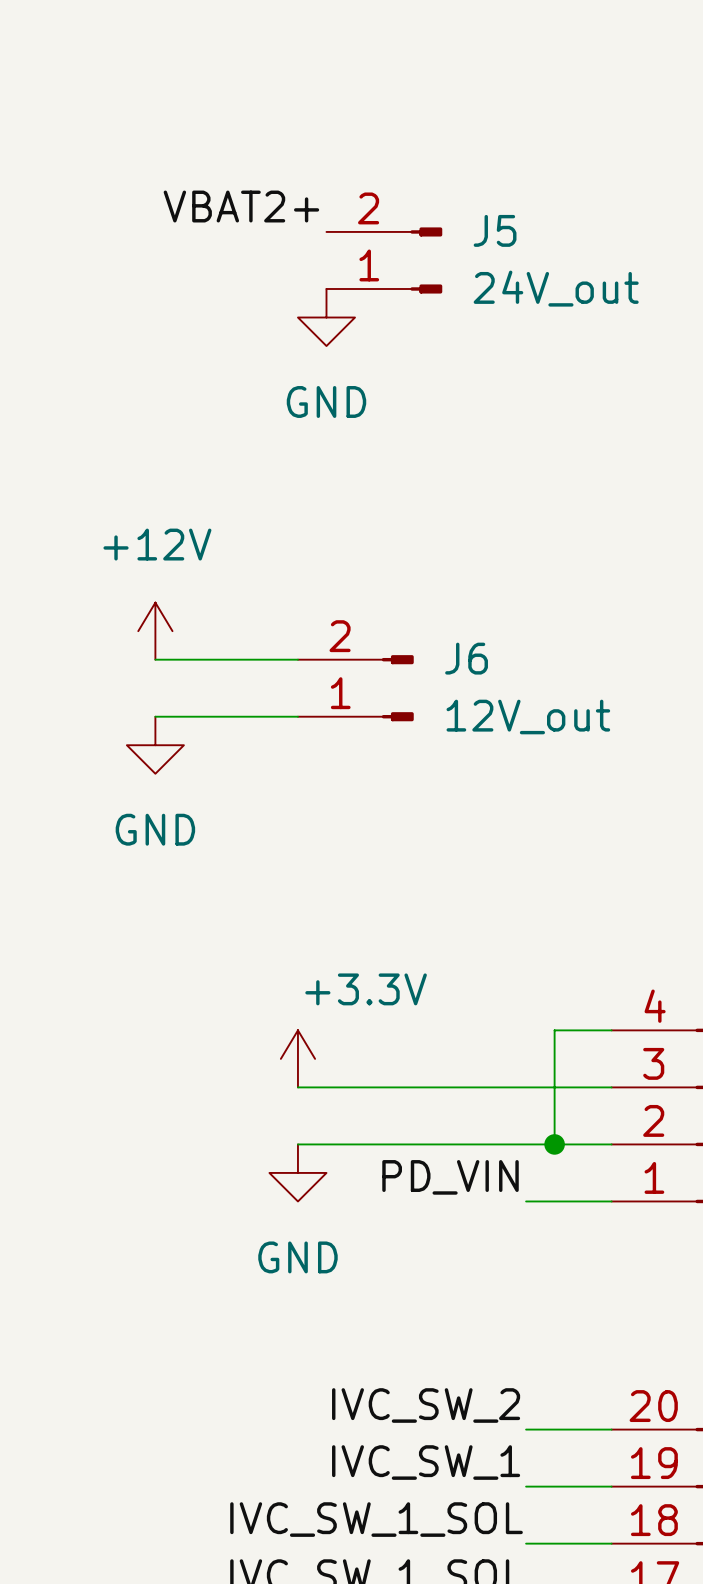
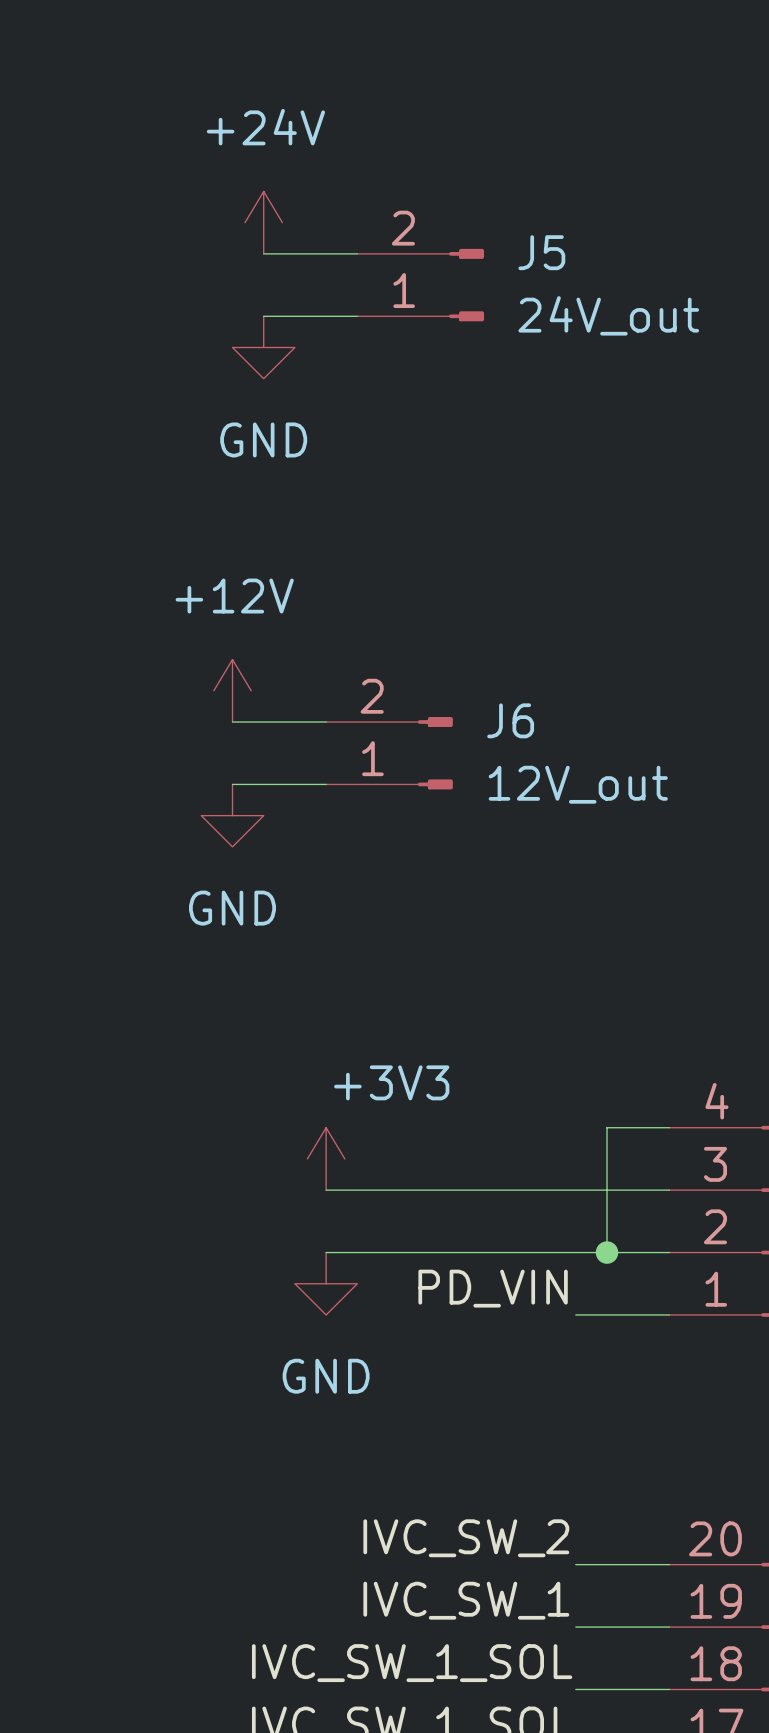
power symbol: none -> +24V (263, 222)
label: VBAT2+ (241, 206) -> none
wire: none -> (263, 253) (357, 253)
wire: none -> (263, 316) (357, 316)
power symbol position: GND (326, 317) -> GND (263, 347)
power symbol position: +12V (155, 631) -> +12V (232, 690)
wire: (155, 659) (212, 659) -> none
wire: (155, 716) (212, 716) -> none
power symbol position: GND (155, 745) -> GND (232, 815)
power symbol: +3.3V (297, 1058) -> +3V3 (326, 1158)

